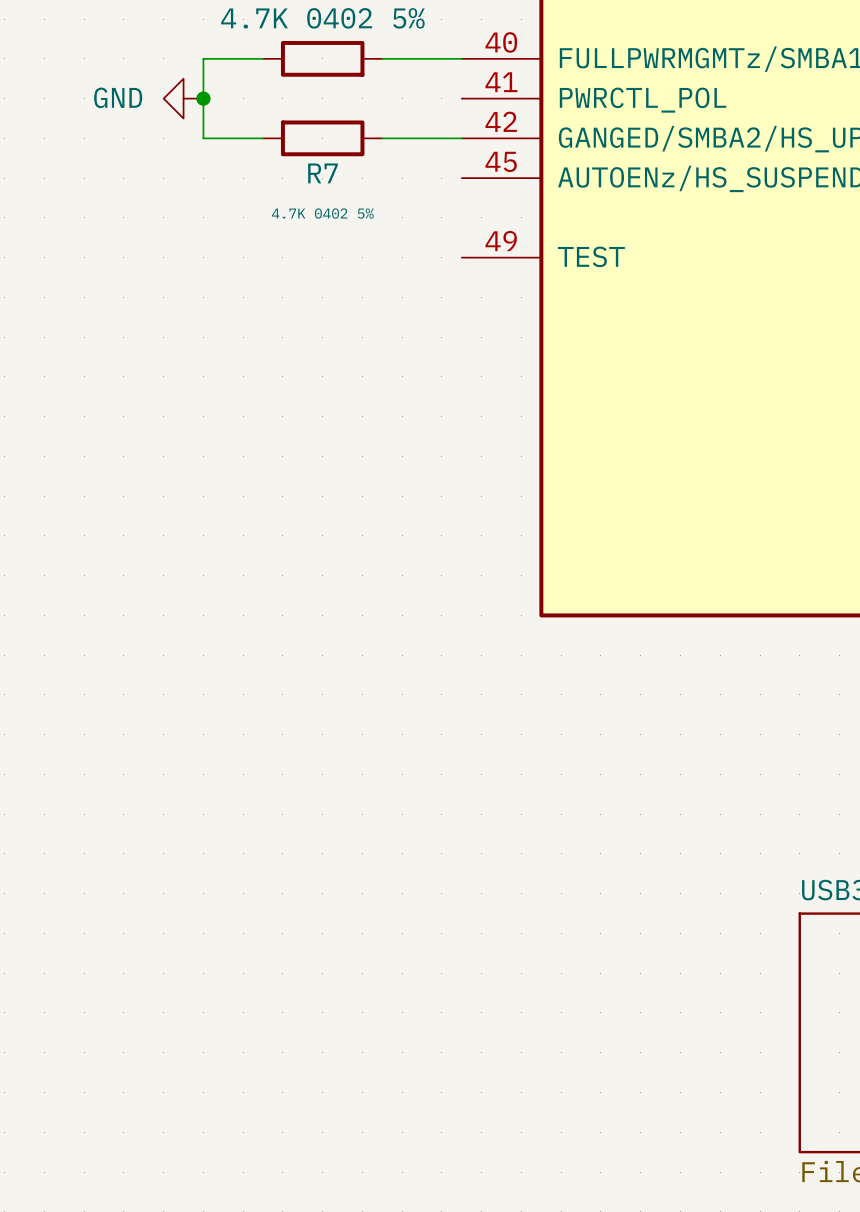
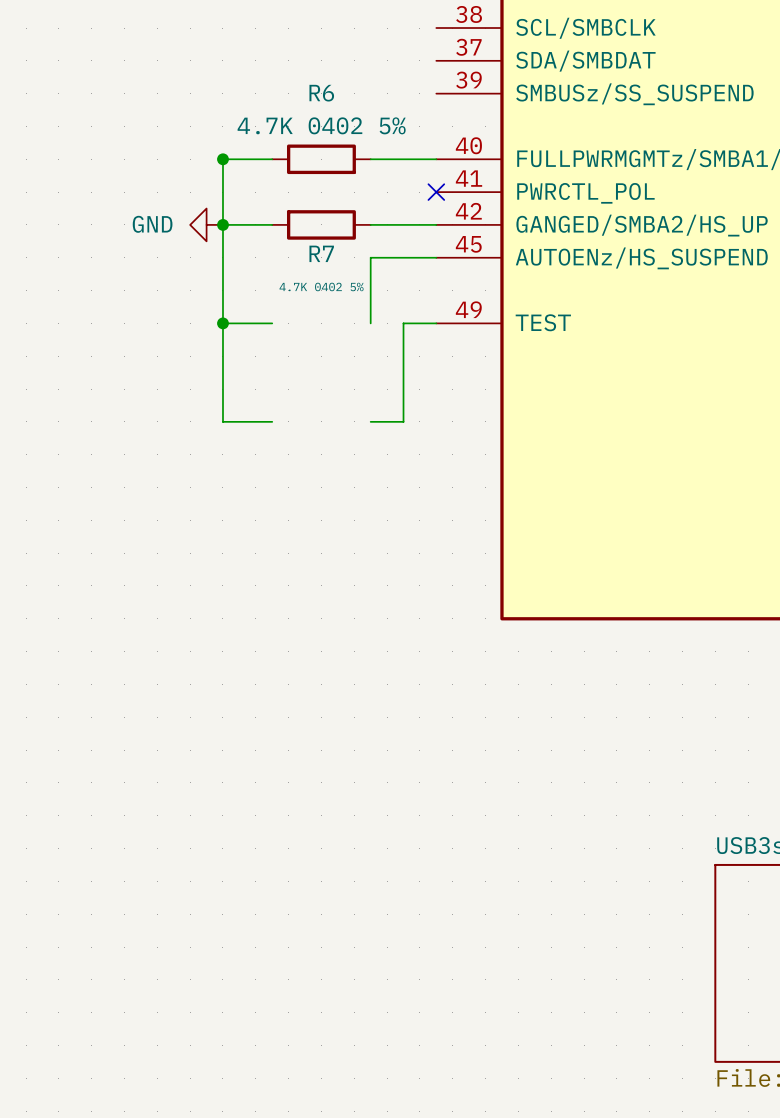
junction: none -> (222, 159)
power symbol position: GND (183, 98) -> GND (206, 224)
junction: (203, 98) -> none
no-connect mark: none -> (436, 192)
wire: none -> (222, 224) (222, 421) (272, 421)
junction: none -> (222, 224)
wire: none -> (436, 257) (370, 257) (370, 323)
wire: none -> (222, 323) (272, 323)
junction: none -> (222, 323)
wire: none -> (436, 323) (403, 323) (403, 421) (370, 421)

